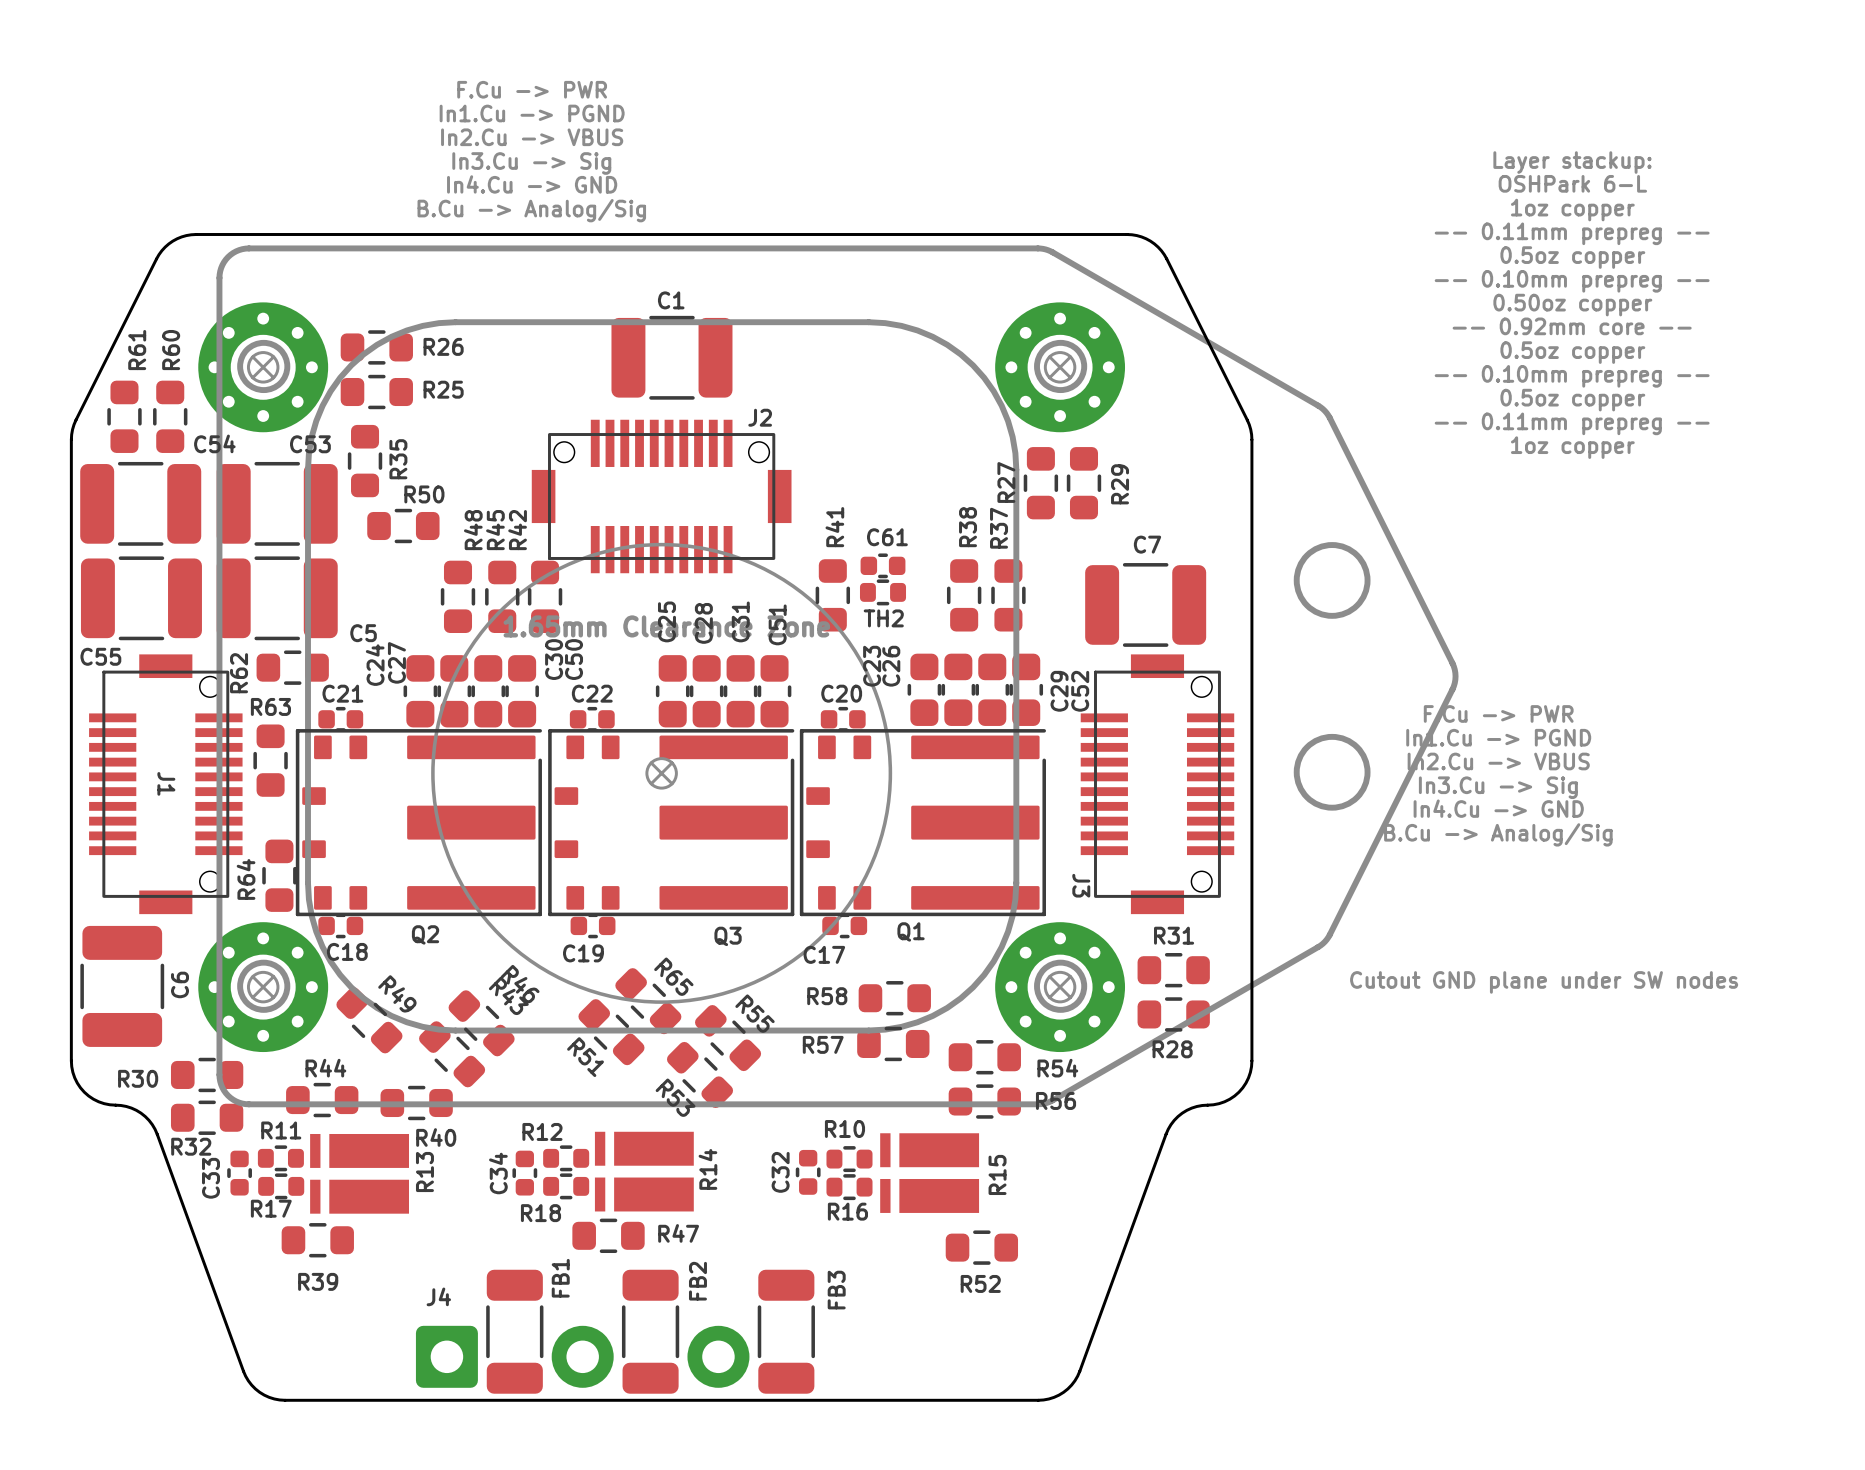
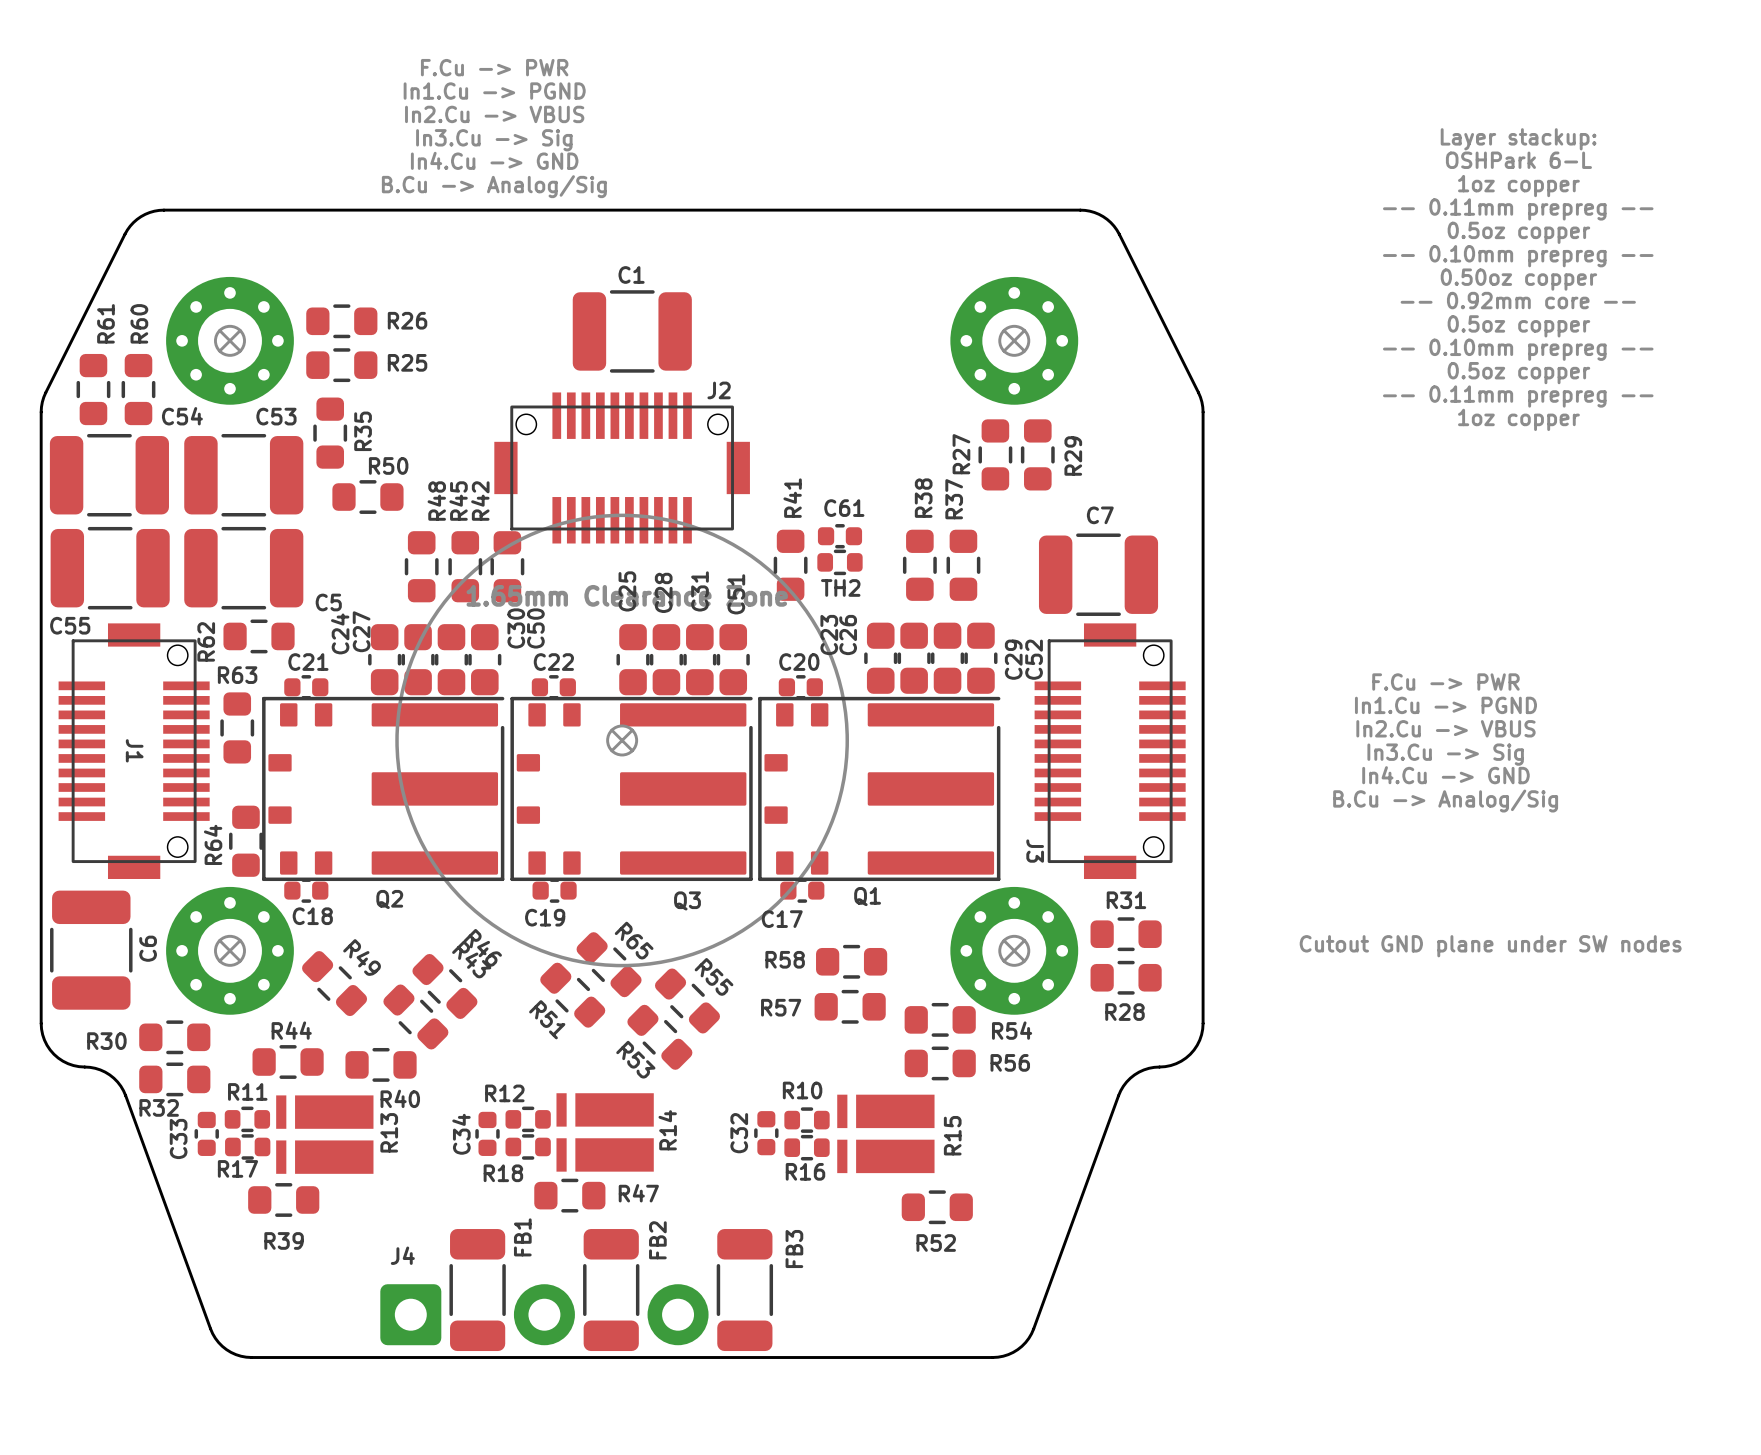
line: (248, 248) (1037, 248) (1048, 250) (1324, 410) (1452, 663) (1455, 676) (1453, 686) (1324, 941) (1049, 1102) (1037, 1104) (248, 1104) (239, 1102) (225, 1093) (221, 1084) (219, 1074) (219, 277) (221, 268) (228, 257) (236, 251) (248, 248) -> none
line: (455, 322) (885, 323) (917, 330) (932, 336) (960, 354) (984, 377) (993, 391) (1008, 421) (1015, 453) (1016, 882) (1012, 915) (1001, 946) (984, 974) (960, 998) (947, 1007) (917, 1022) (885, 1029) (455, 1030) (422, 1026) (391, 1015) (363, 998) (340, 974) (322, 946) (316, 931) (308, 899) (308, 882) (308, 469) (311, 436) (322, 405) (330, 391) (351, 365) (363, 354) (377, 344) (406, 330) (422, 325) (455, 322) -> none
drawing: [237, 339, 291, 394] -> none
drawing: [1034, 339, 1088, 394] -> none
drawing: [1293, 542, 1371, 619] -> none
drawing: [1293, 733, 1371, 811] -> none
drawing: [237, 959, 291, 1013] -> none
drawing: [1034, 959, 1088, 1013] -> none

